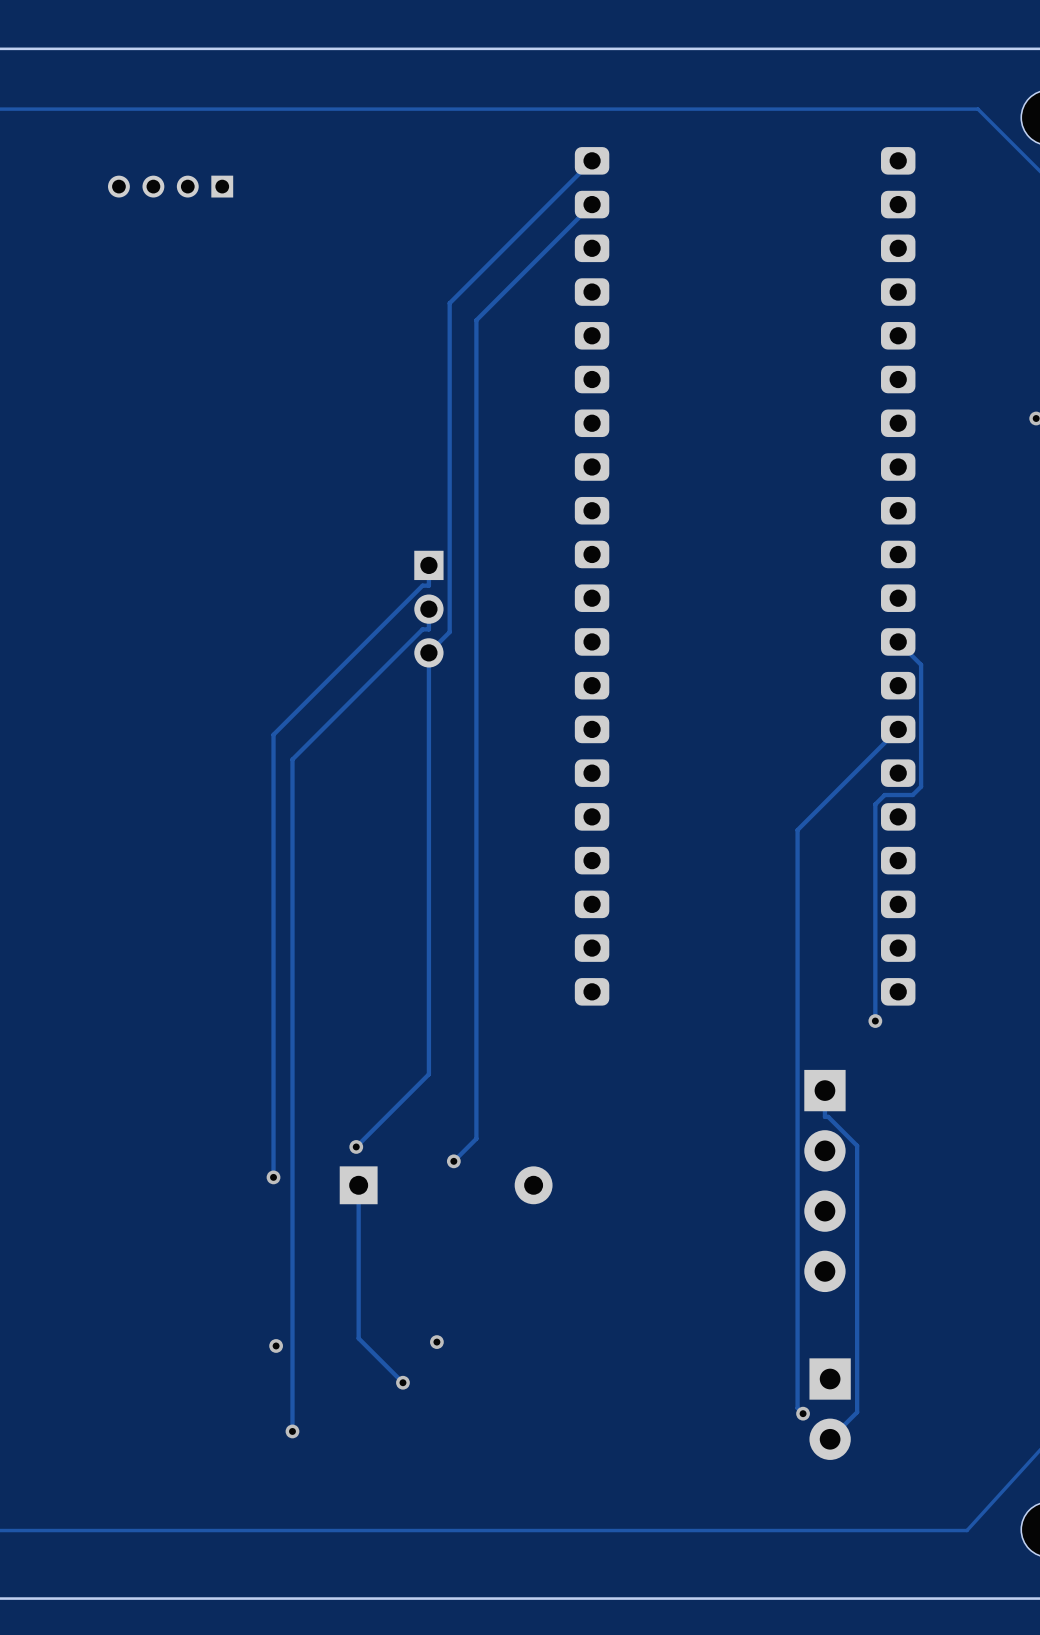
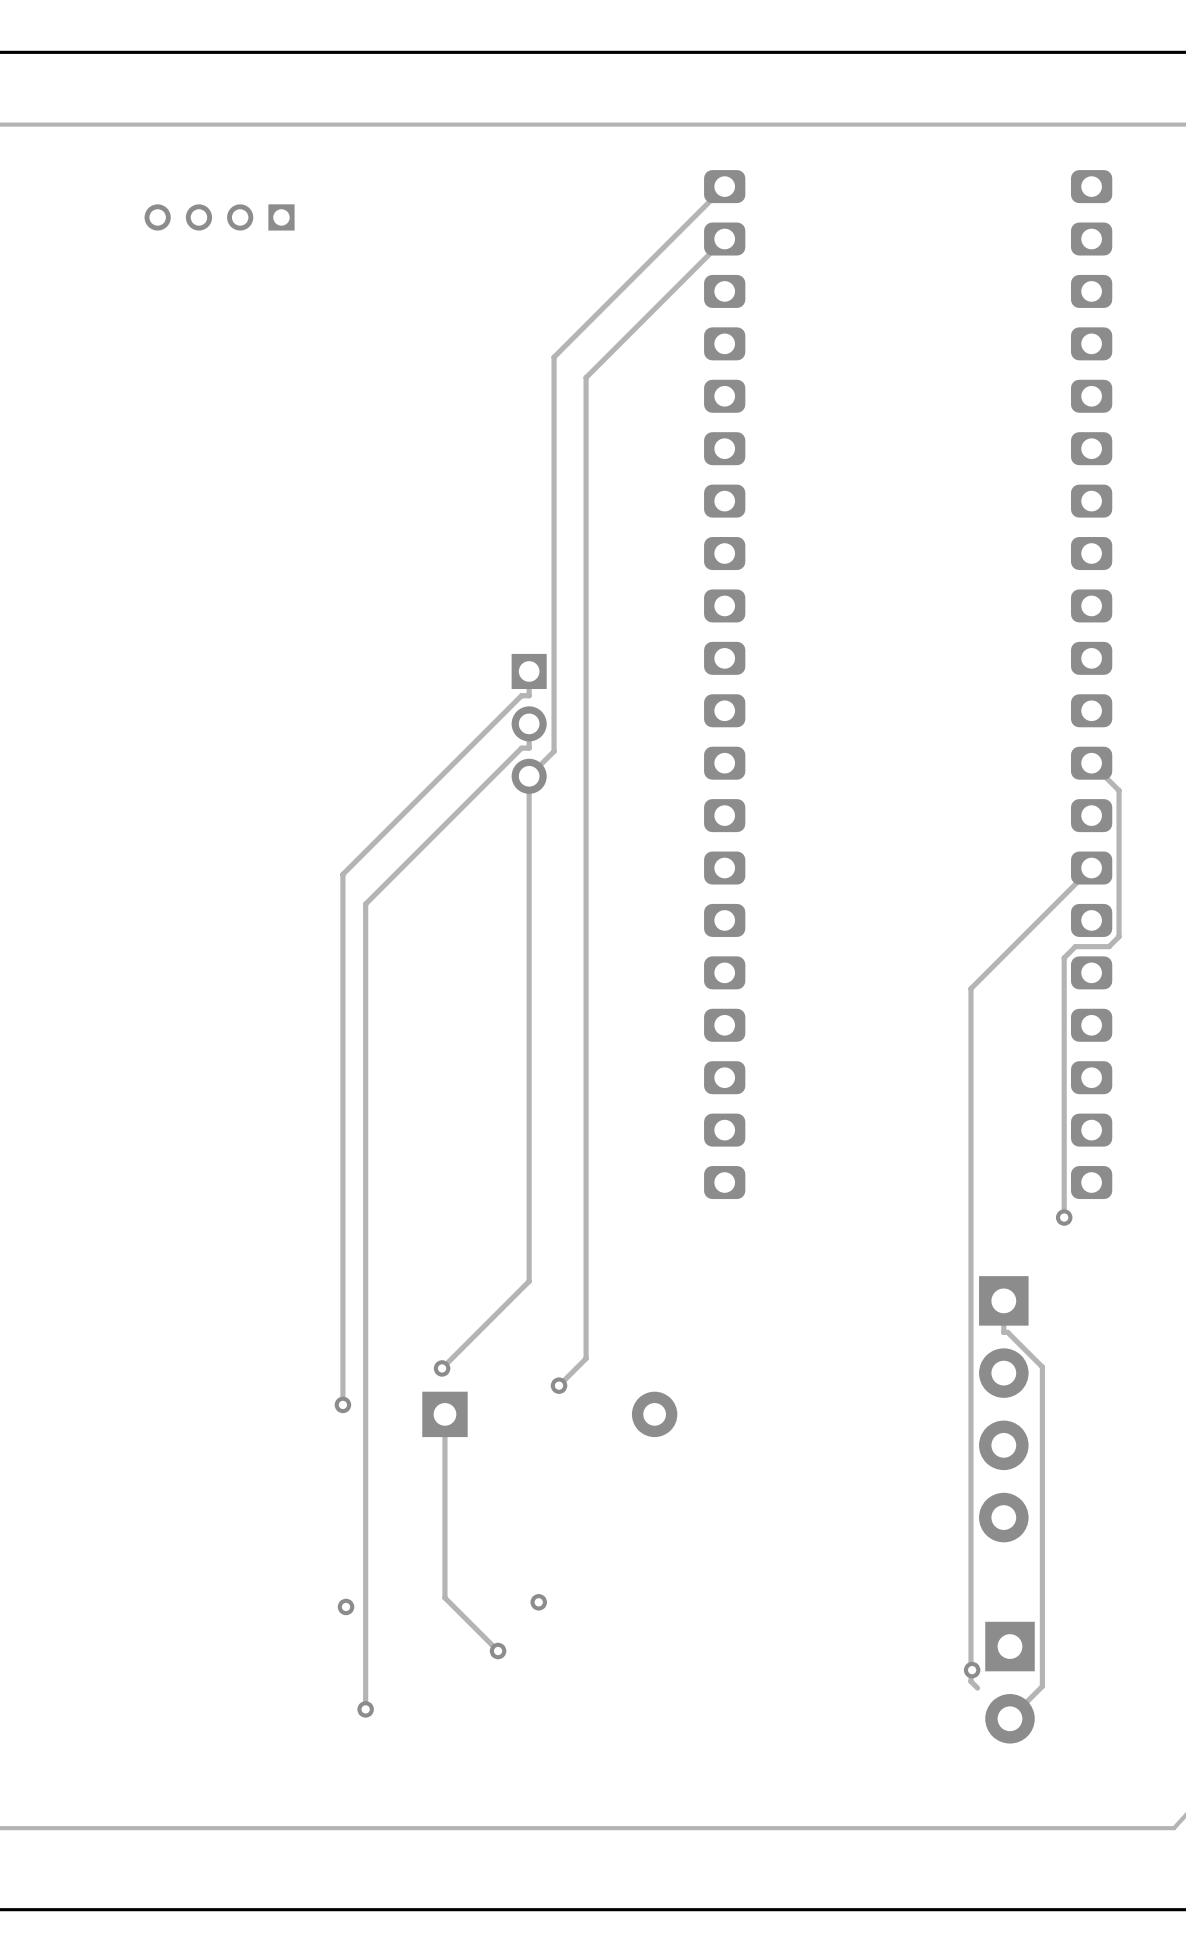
via position: (803, 1413) -> (972, 1670)

